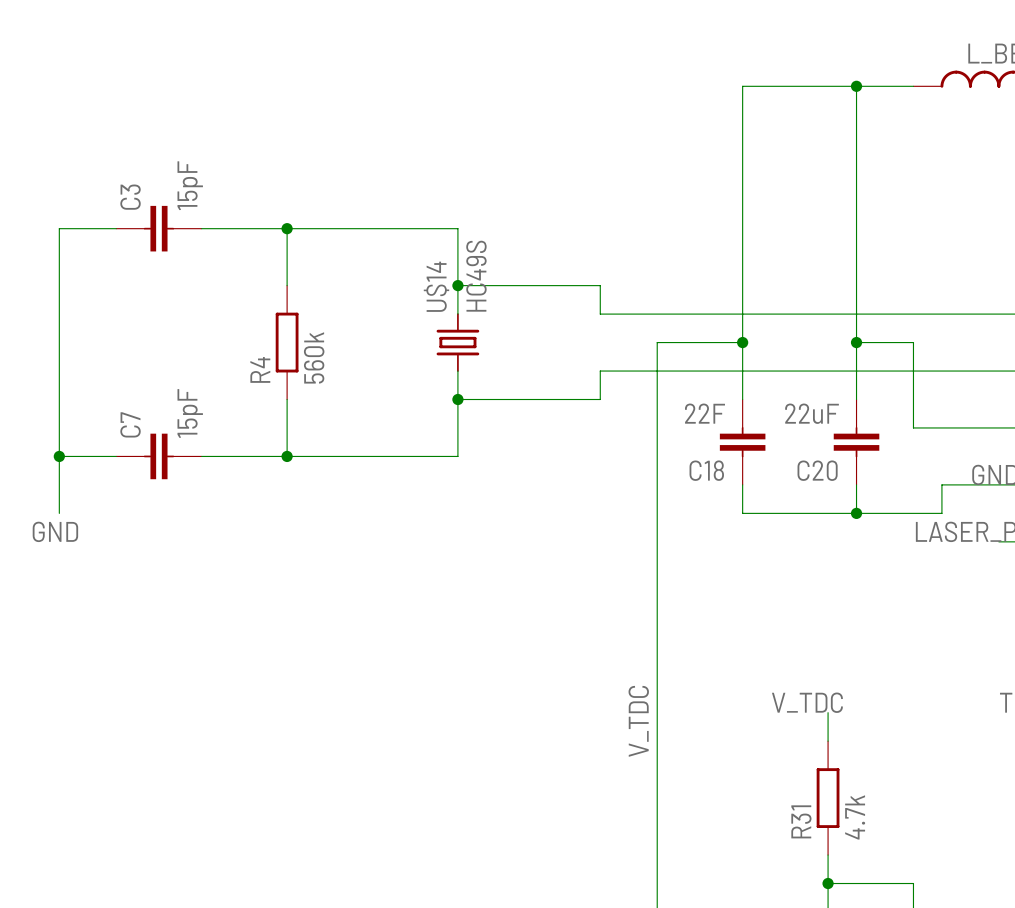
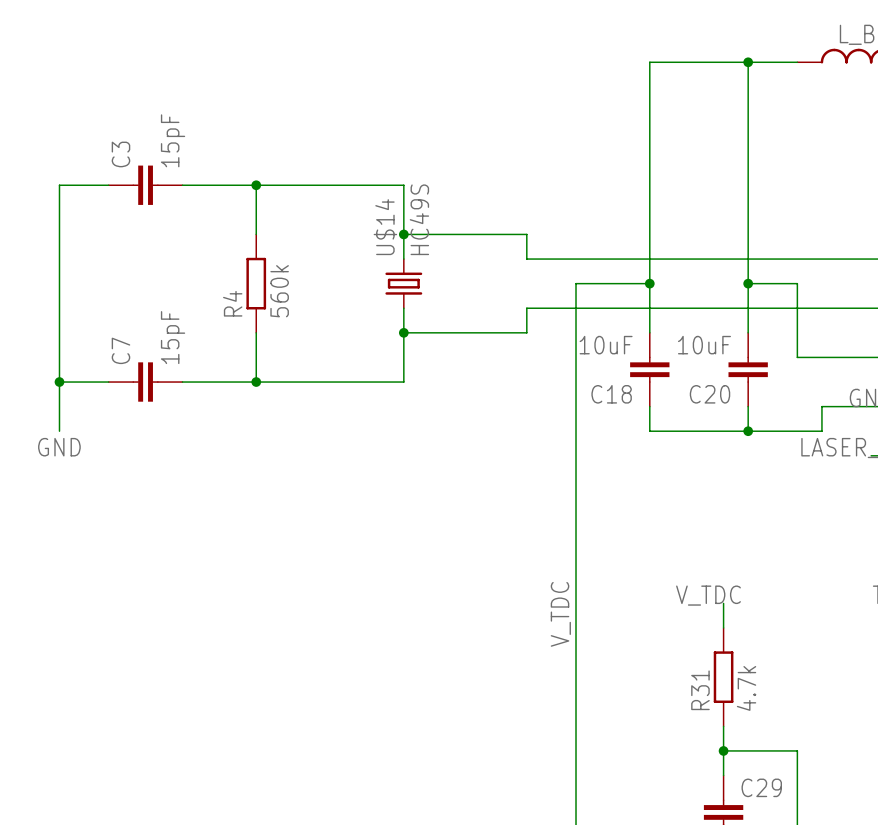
C18 value: 22F (704, 413) -> 10uF (606, 345)
C20 value: 22uF (812, 413) -> 10uF (704, 345)

